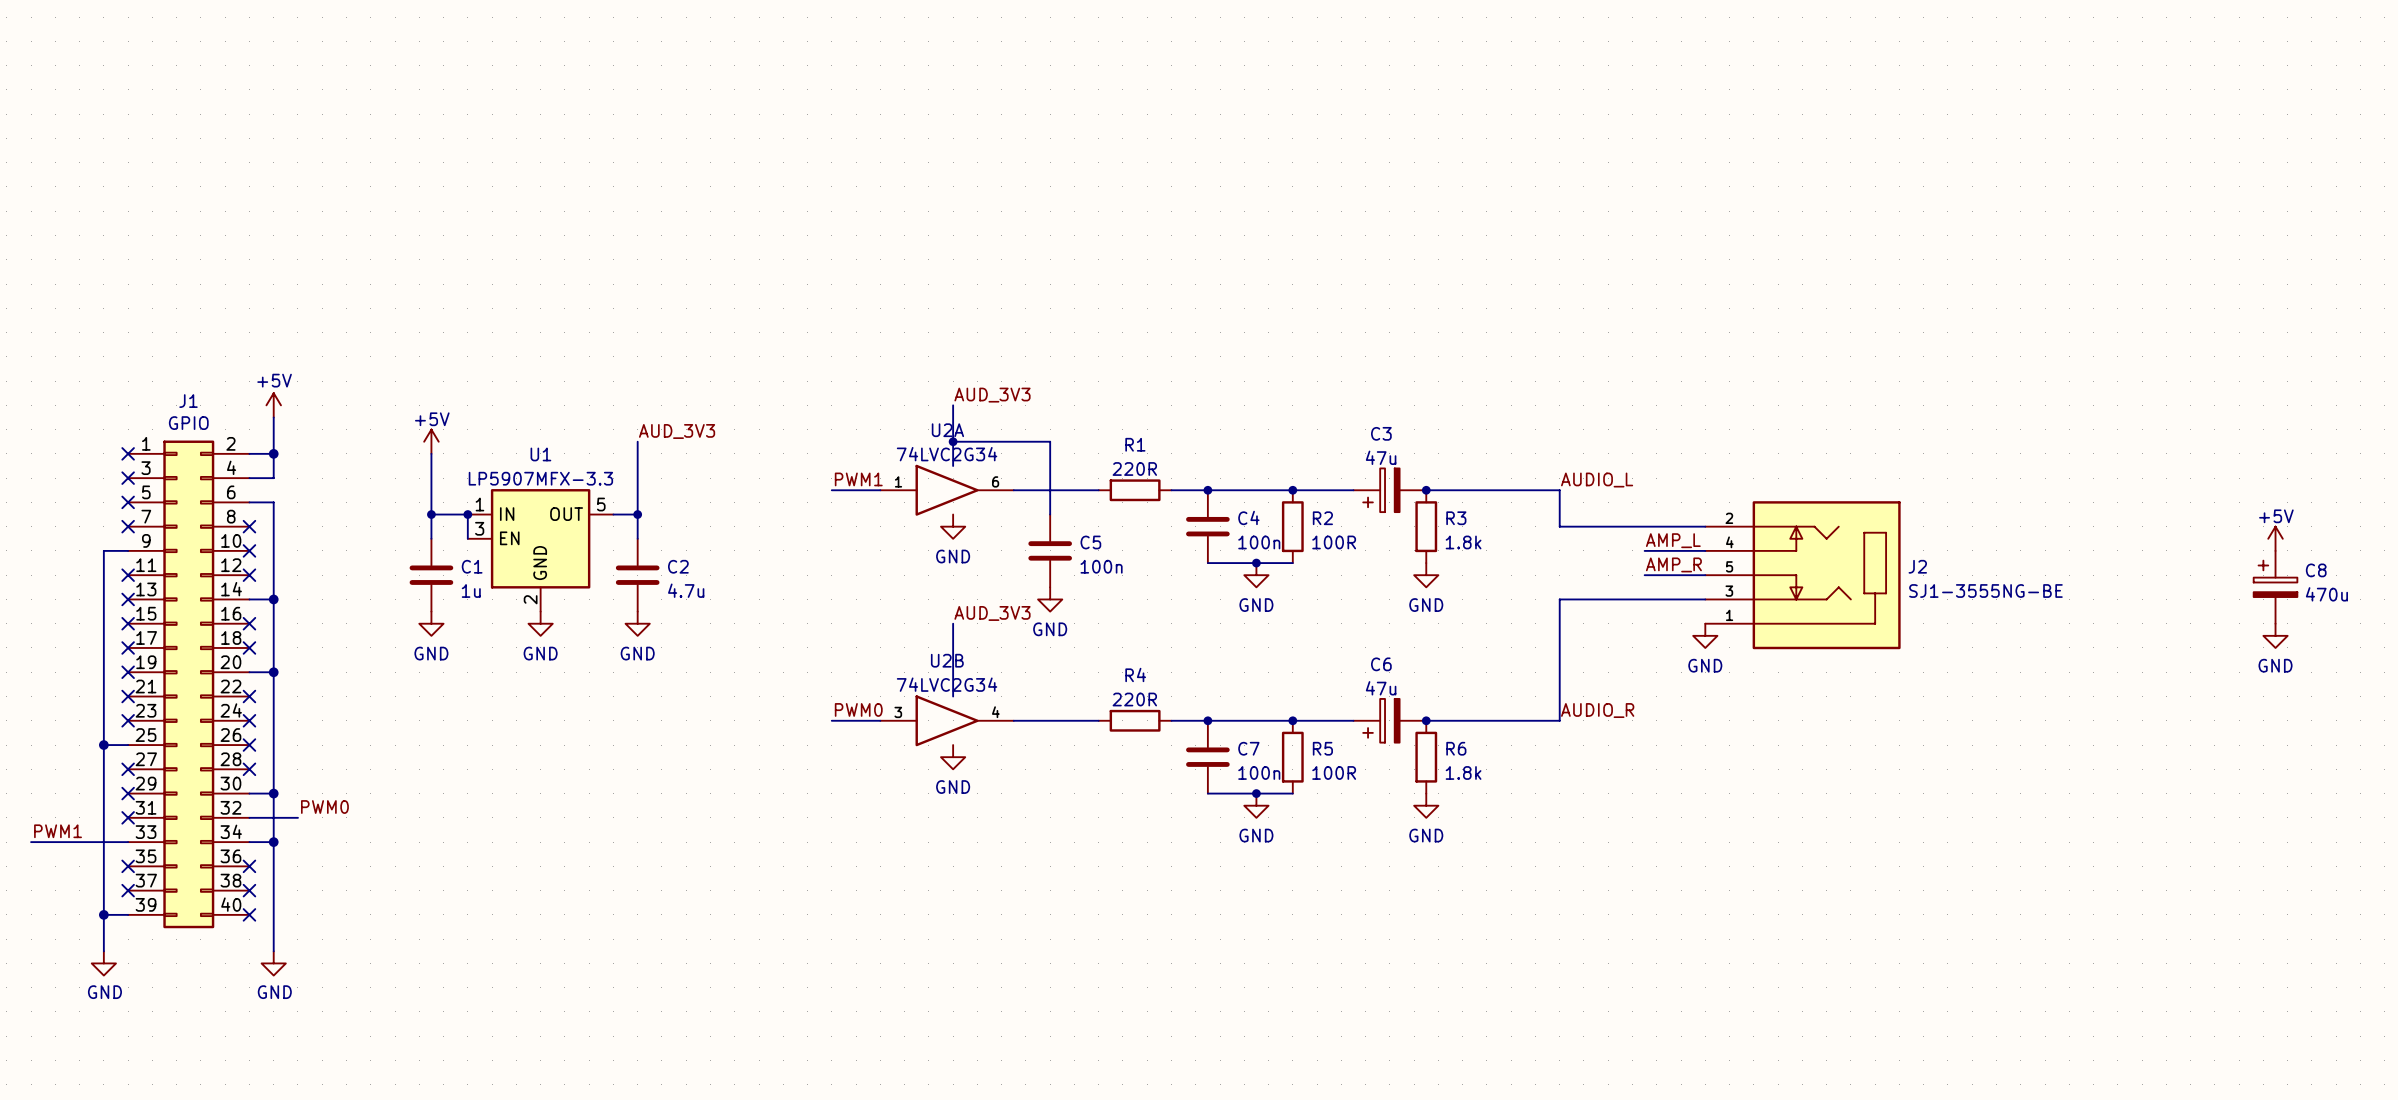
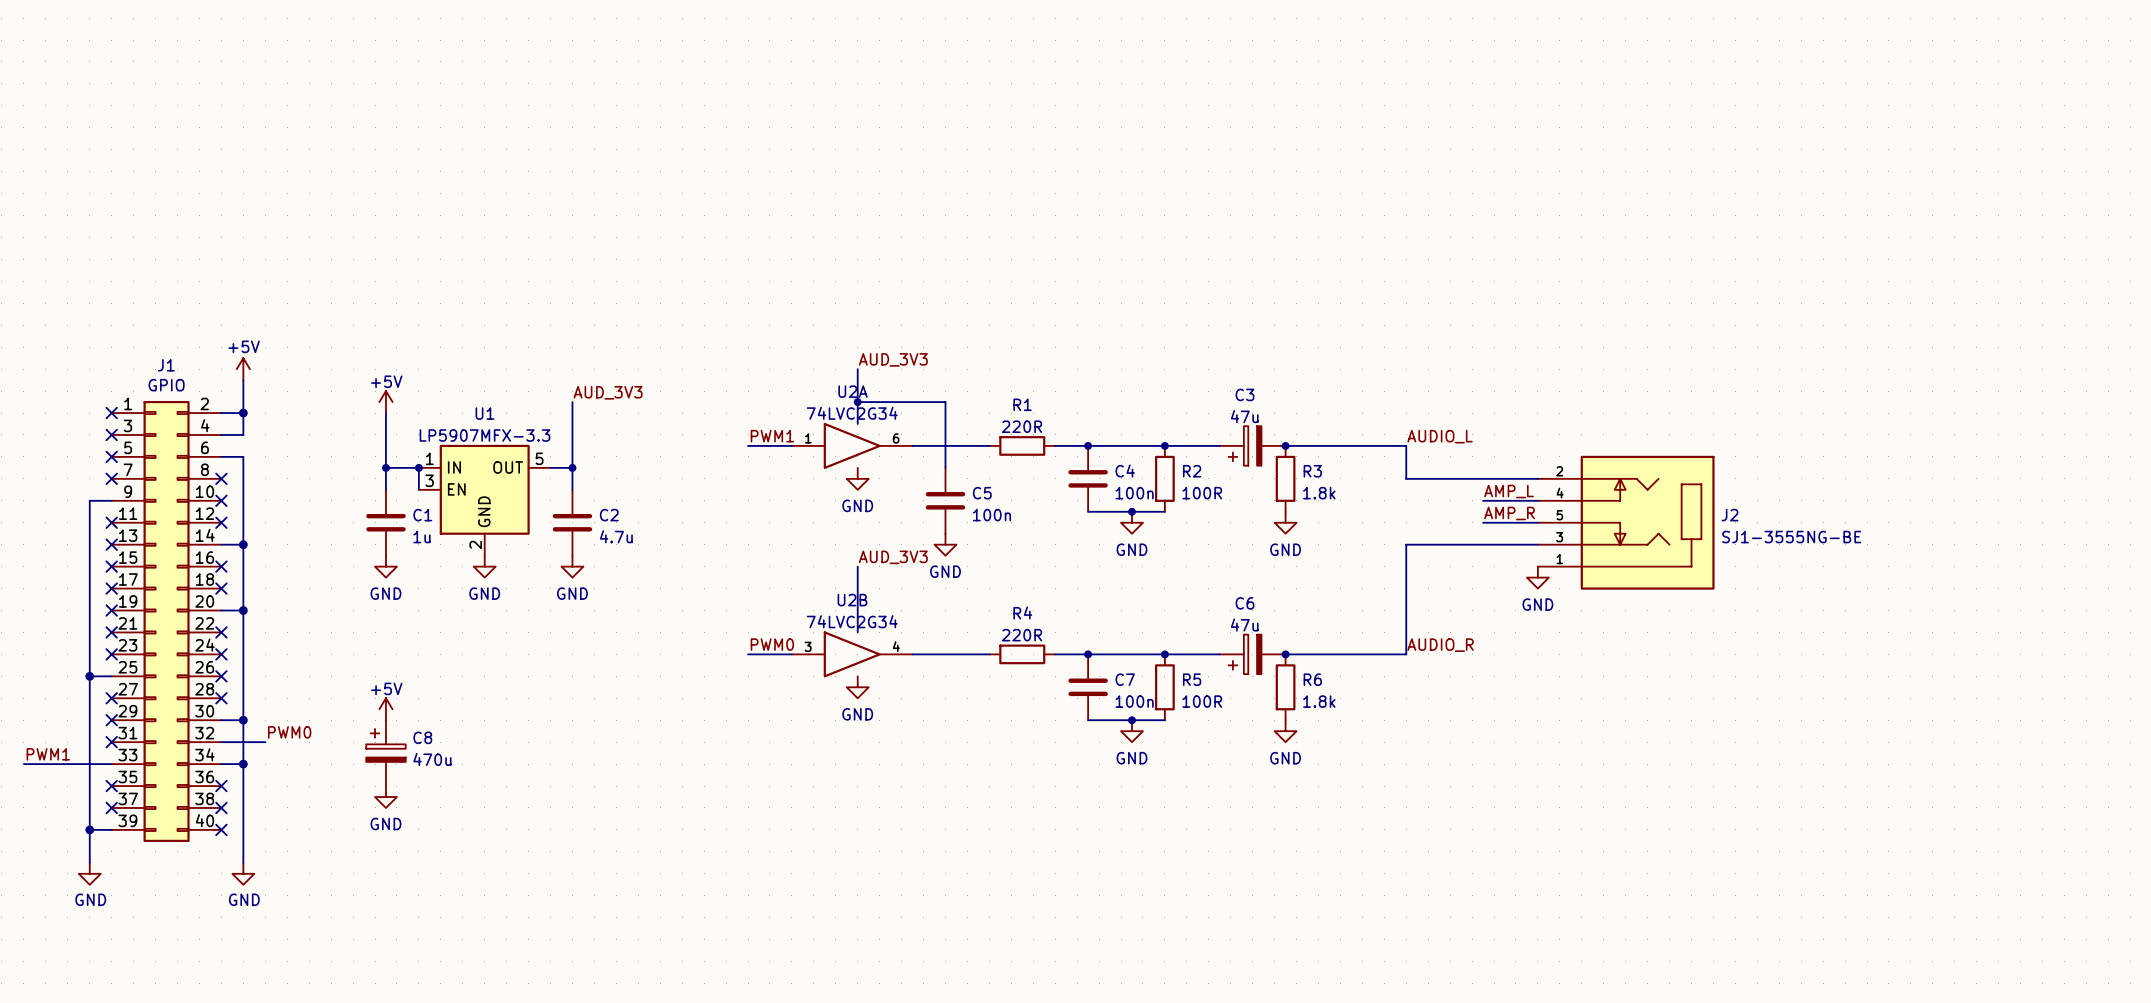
power symbol: +5V (2275, 538) -> none
C8 position: (2275, 587) -> (385, 753)
power symbol: GND (2275, 635) -> none
power symbol: none -> +5V (385, 709)
power symbol: none -> GND (385, 797)

